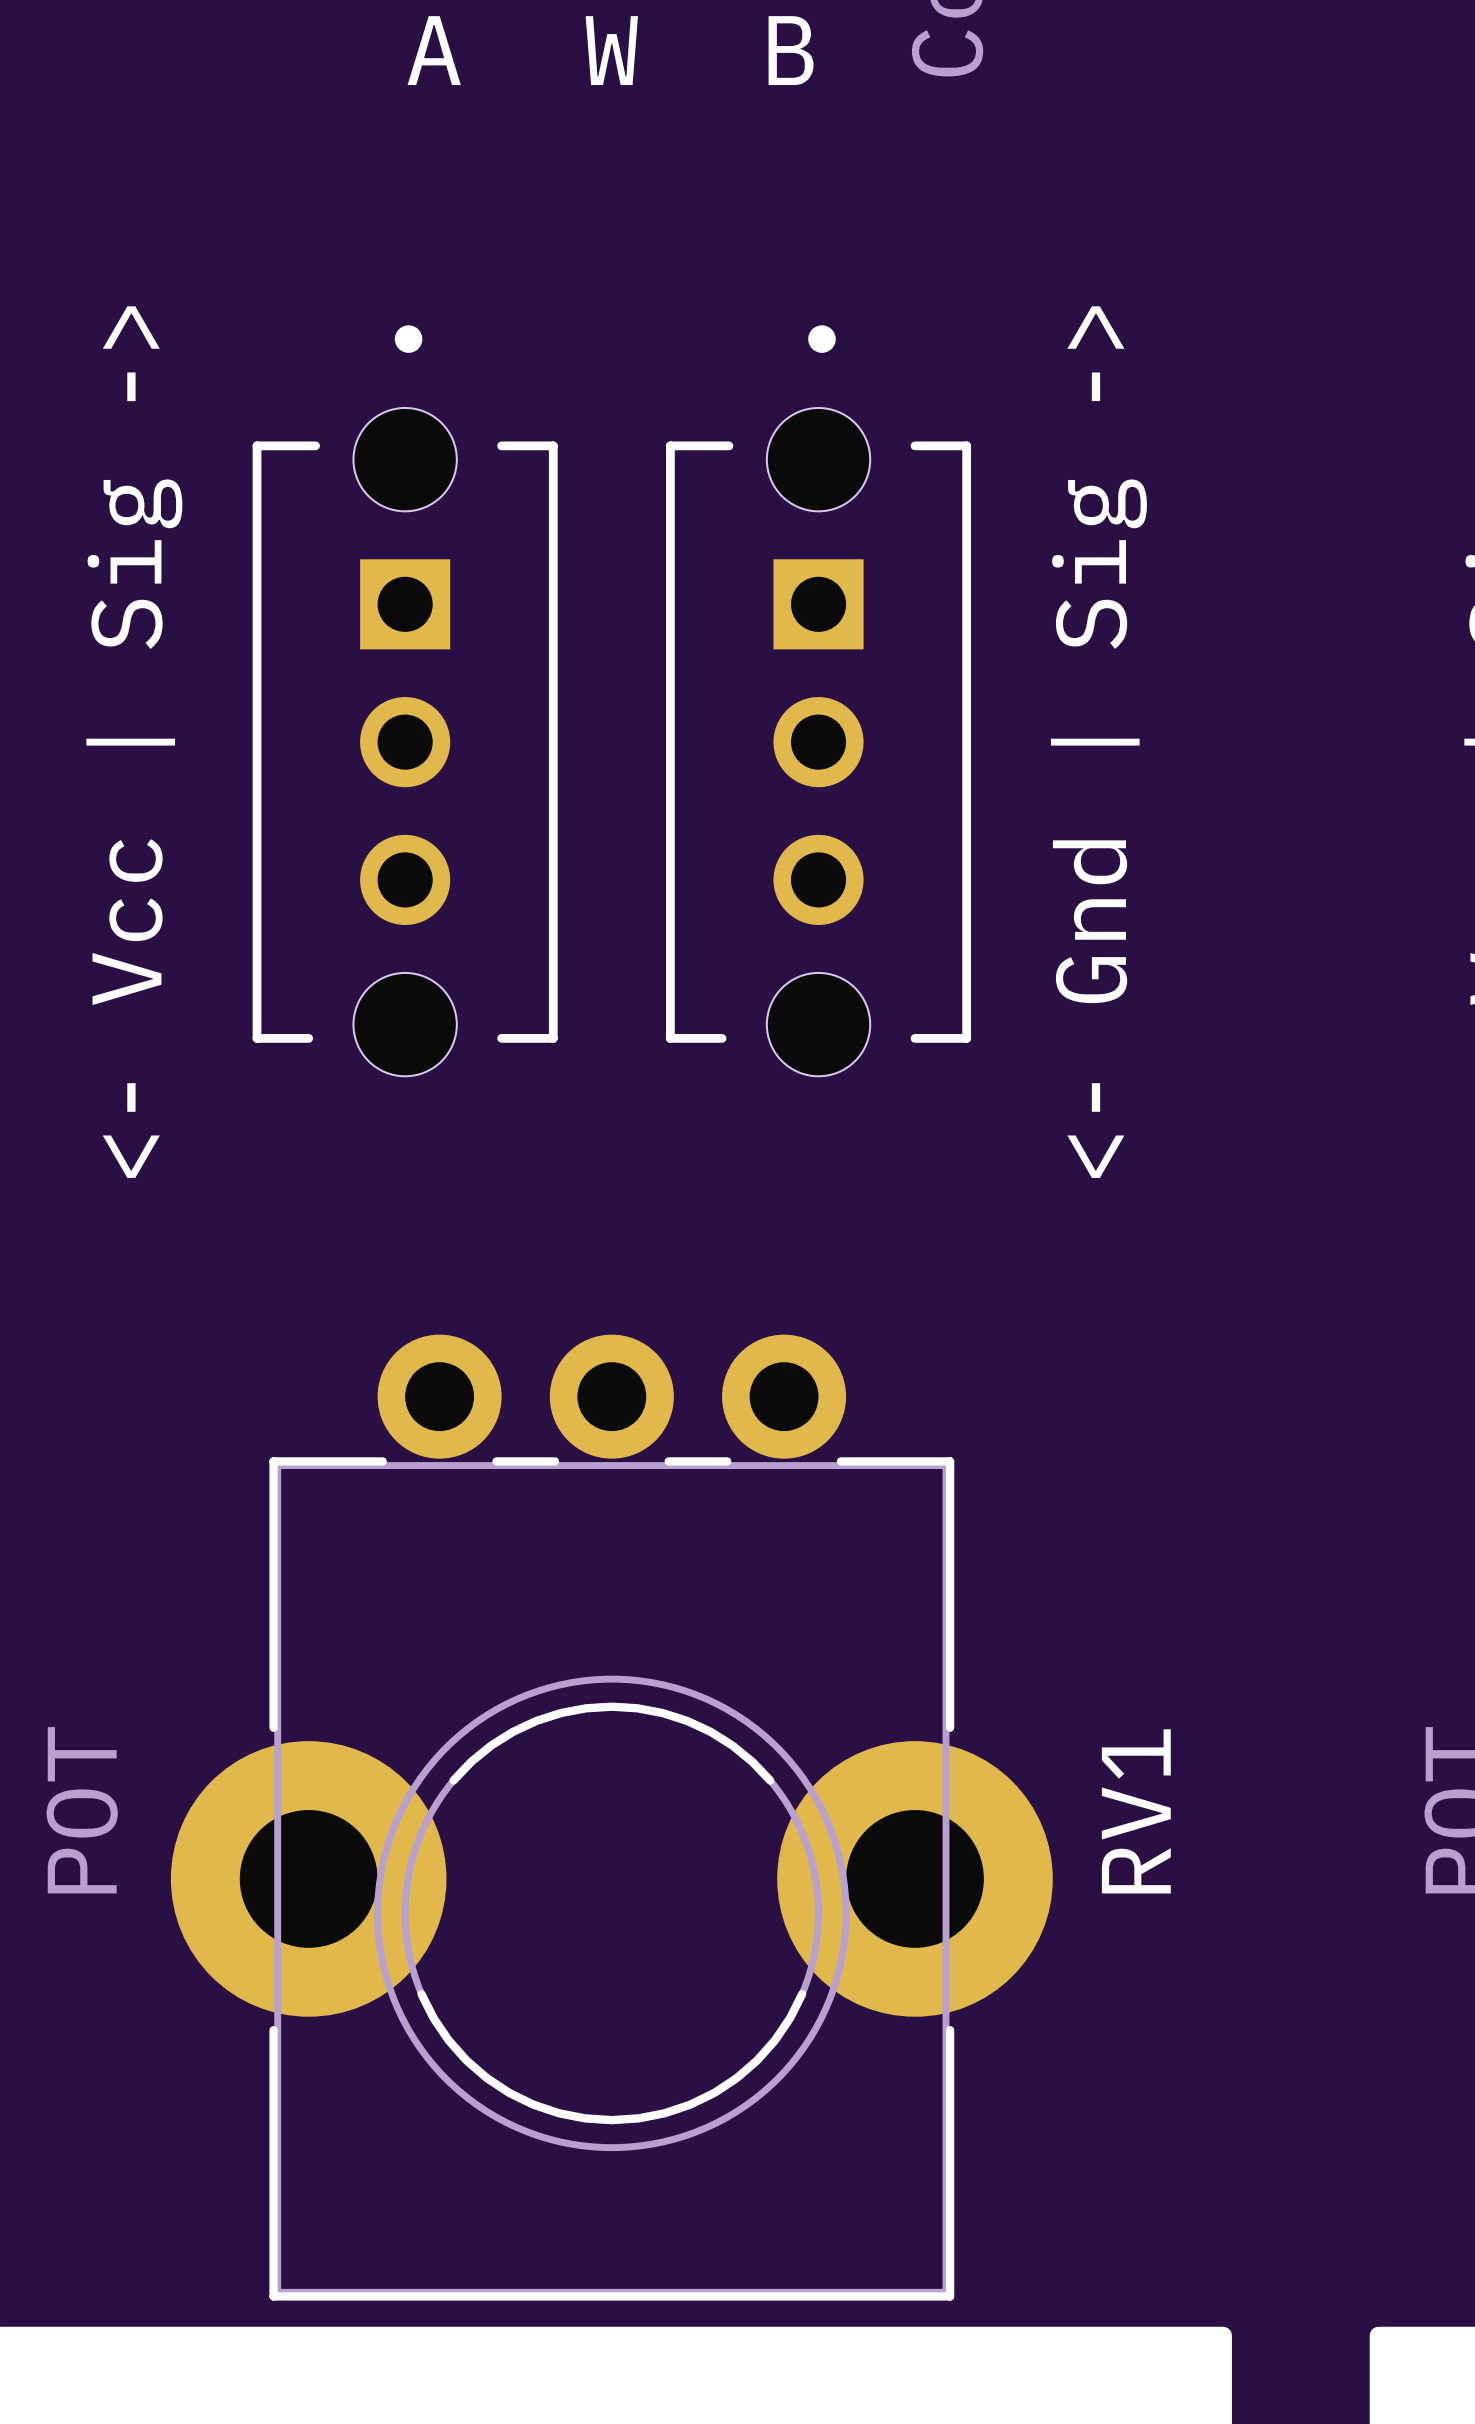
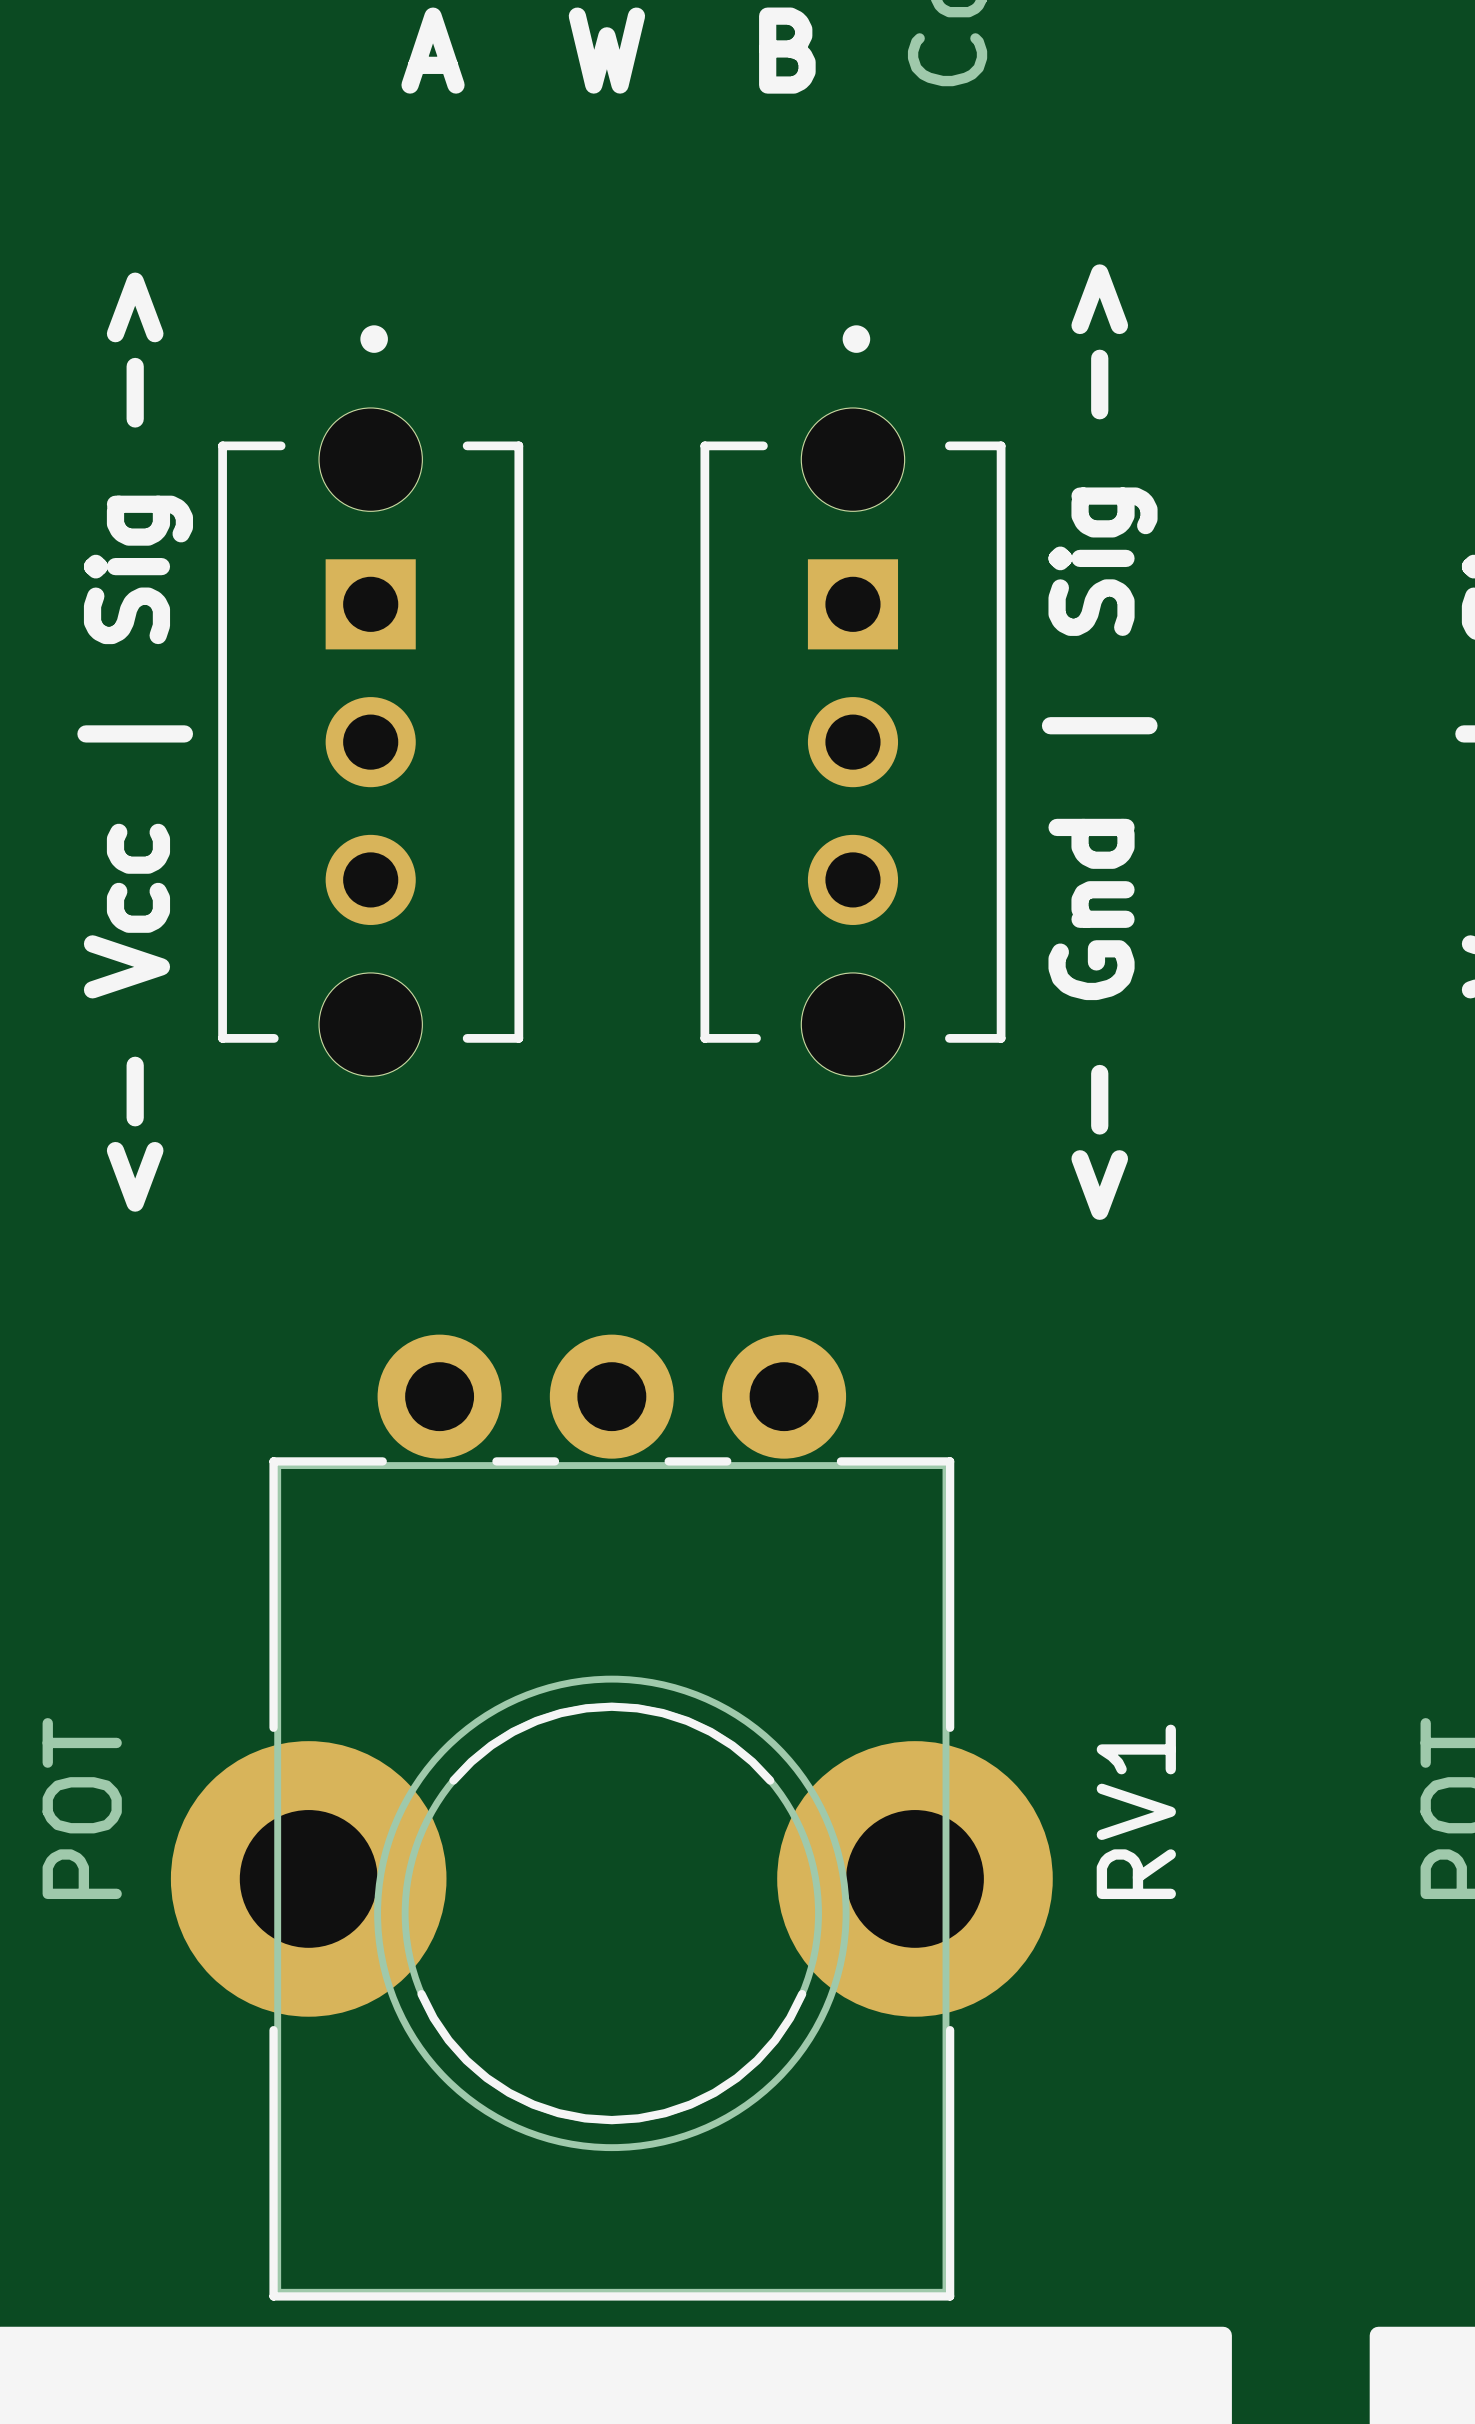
part position: (405, 700) -> (370, 700)
part position: (818, 700) -> (852, 700)

